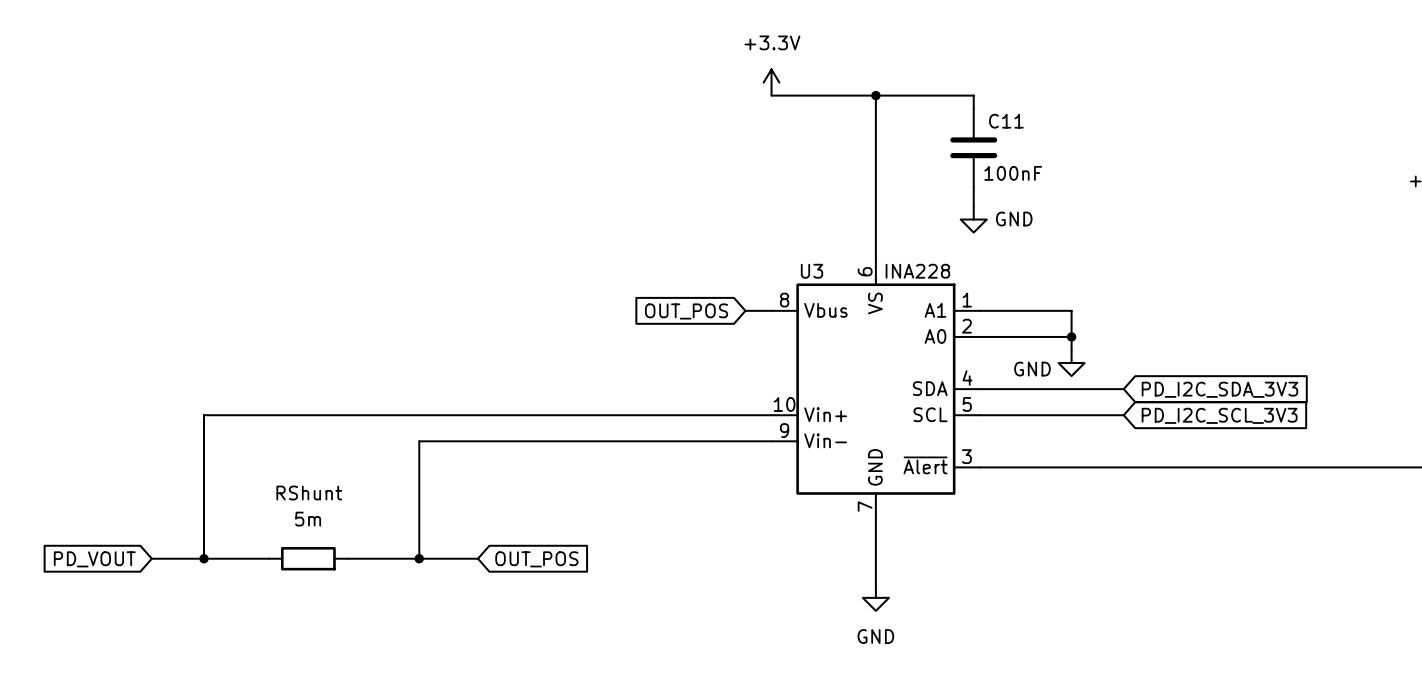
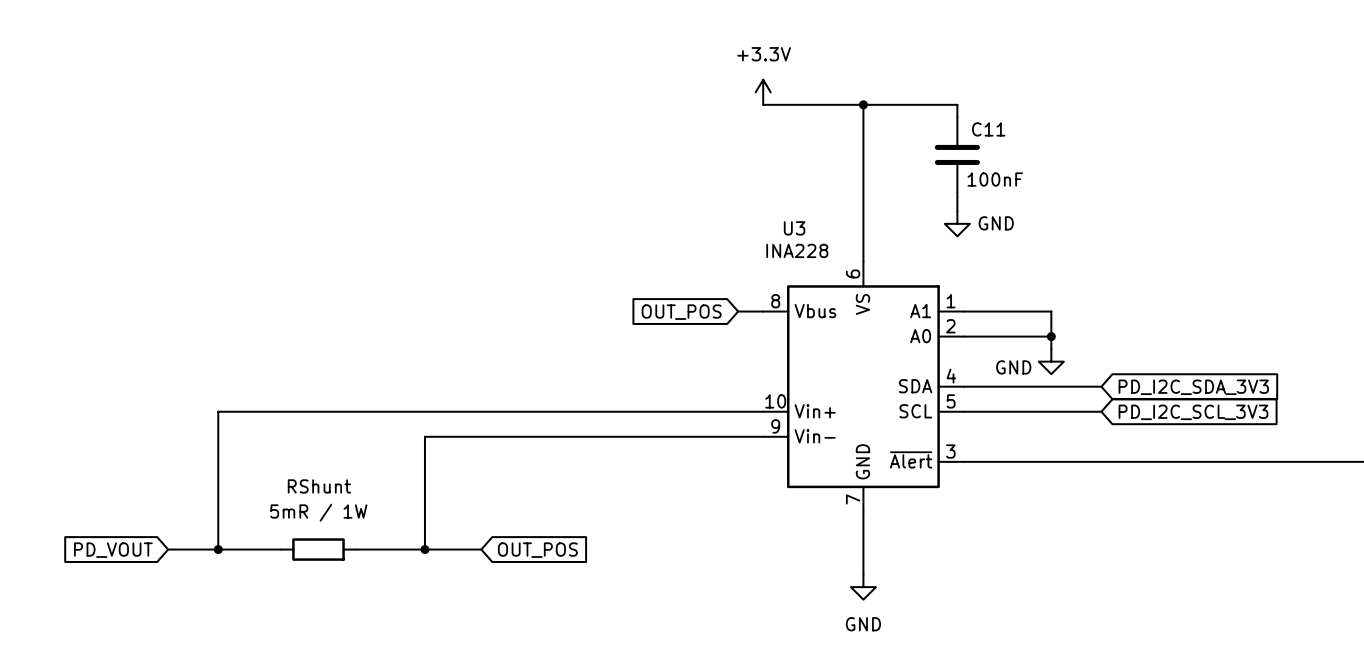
U3 name position: U3 (812, 271) -> U3 (794, 228)
U3 value position: INA228 (917, 271) -> INA228 (797, 250)
RShunt value: 5m (308, 519) -> 5mR / 1W (318, 512)

